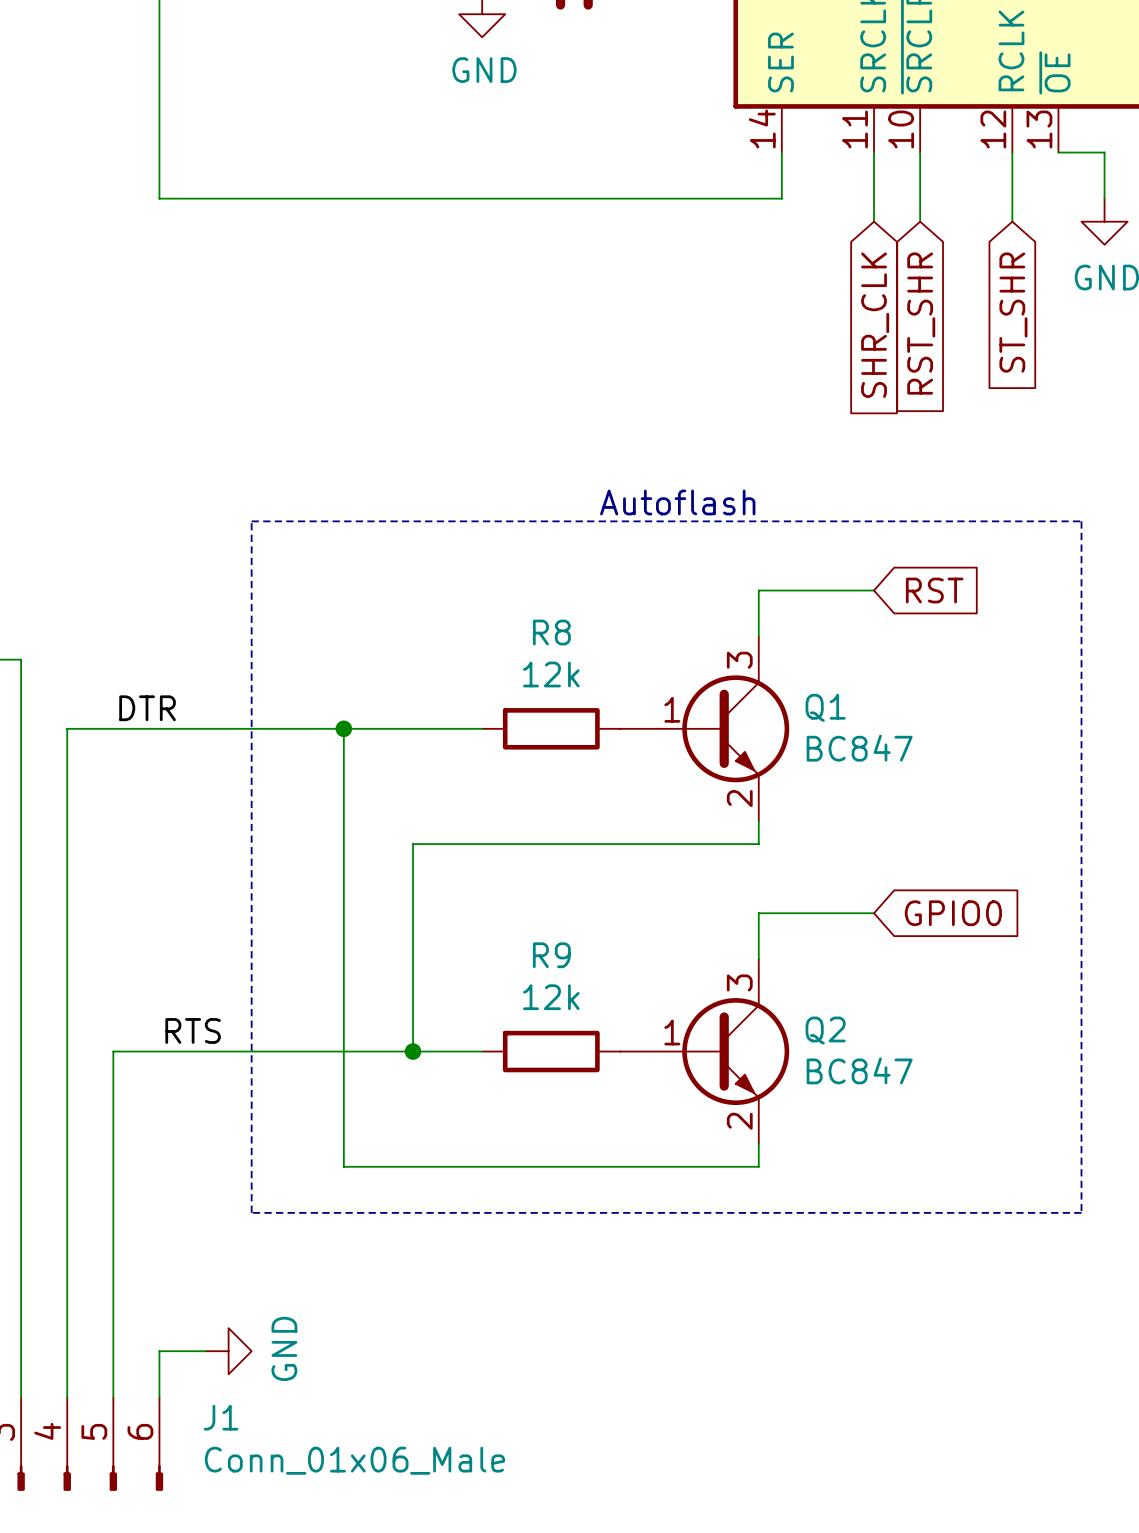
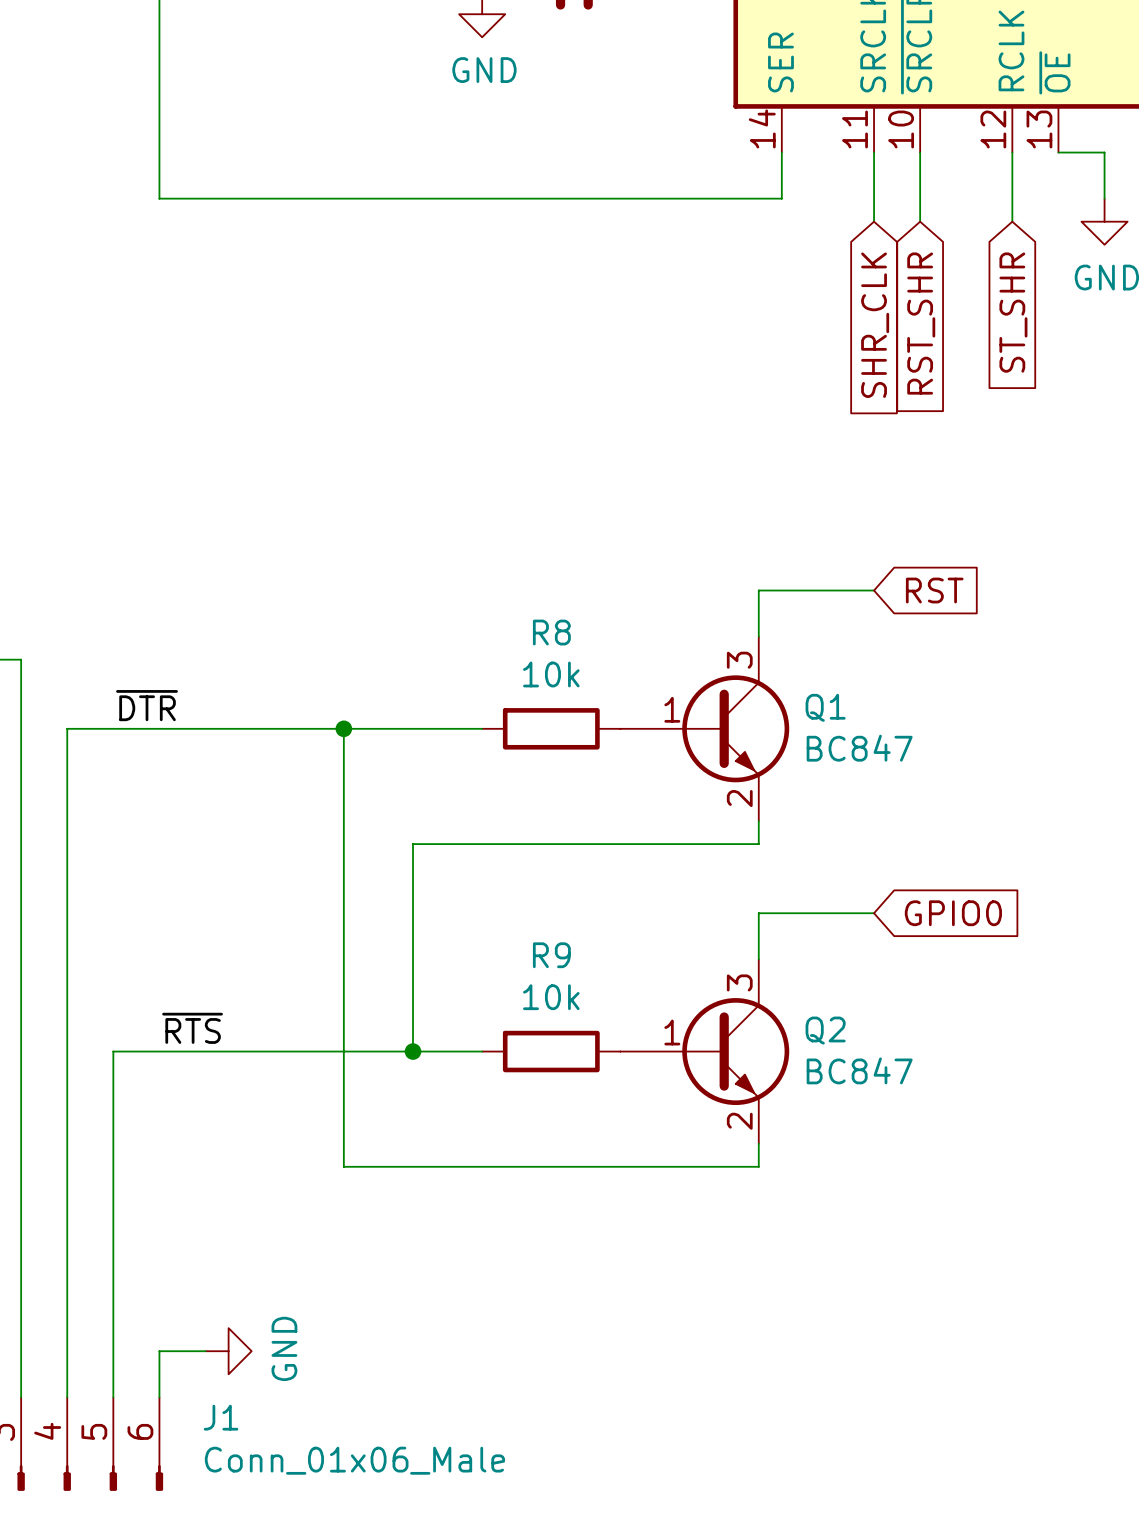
text: Autoflash (677, 502) -> none
line: (251, 521) (251, 1212) (1081, 1212) (1081, 521) (251, 521) -> none
R8 value: 12k (551, 674) -> 10k (551, 674)
label: DTR (147, 708) -> ~{DTR} (146, 705)
R9 value: 12k (551, 997) -> 10k (551, 997)
label: RTS (193, 1030) -> ~{RTS} (192, 1028)

